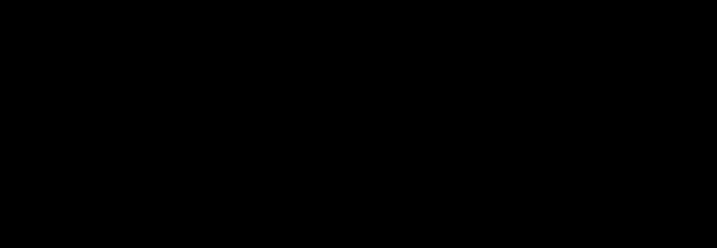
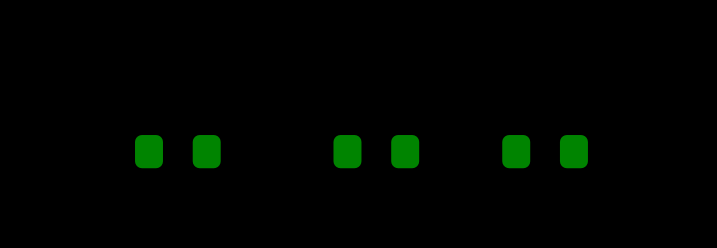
part: none -> (177, 151)
part: none -> (376, 151)
part: none -> (545, 151)

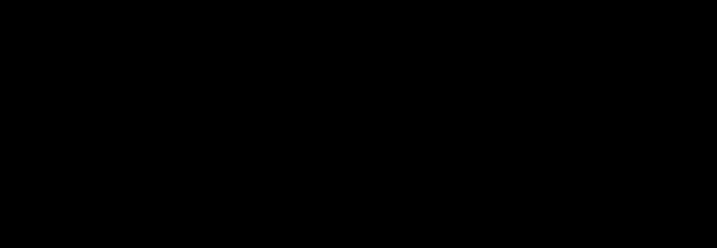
part: (177, 151) -> none
part: (376, 151) -> none
part: (545, 151) -> none

